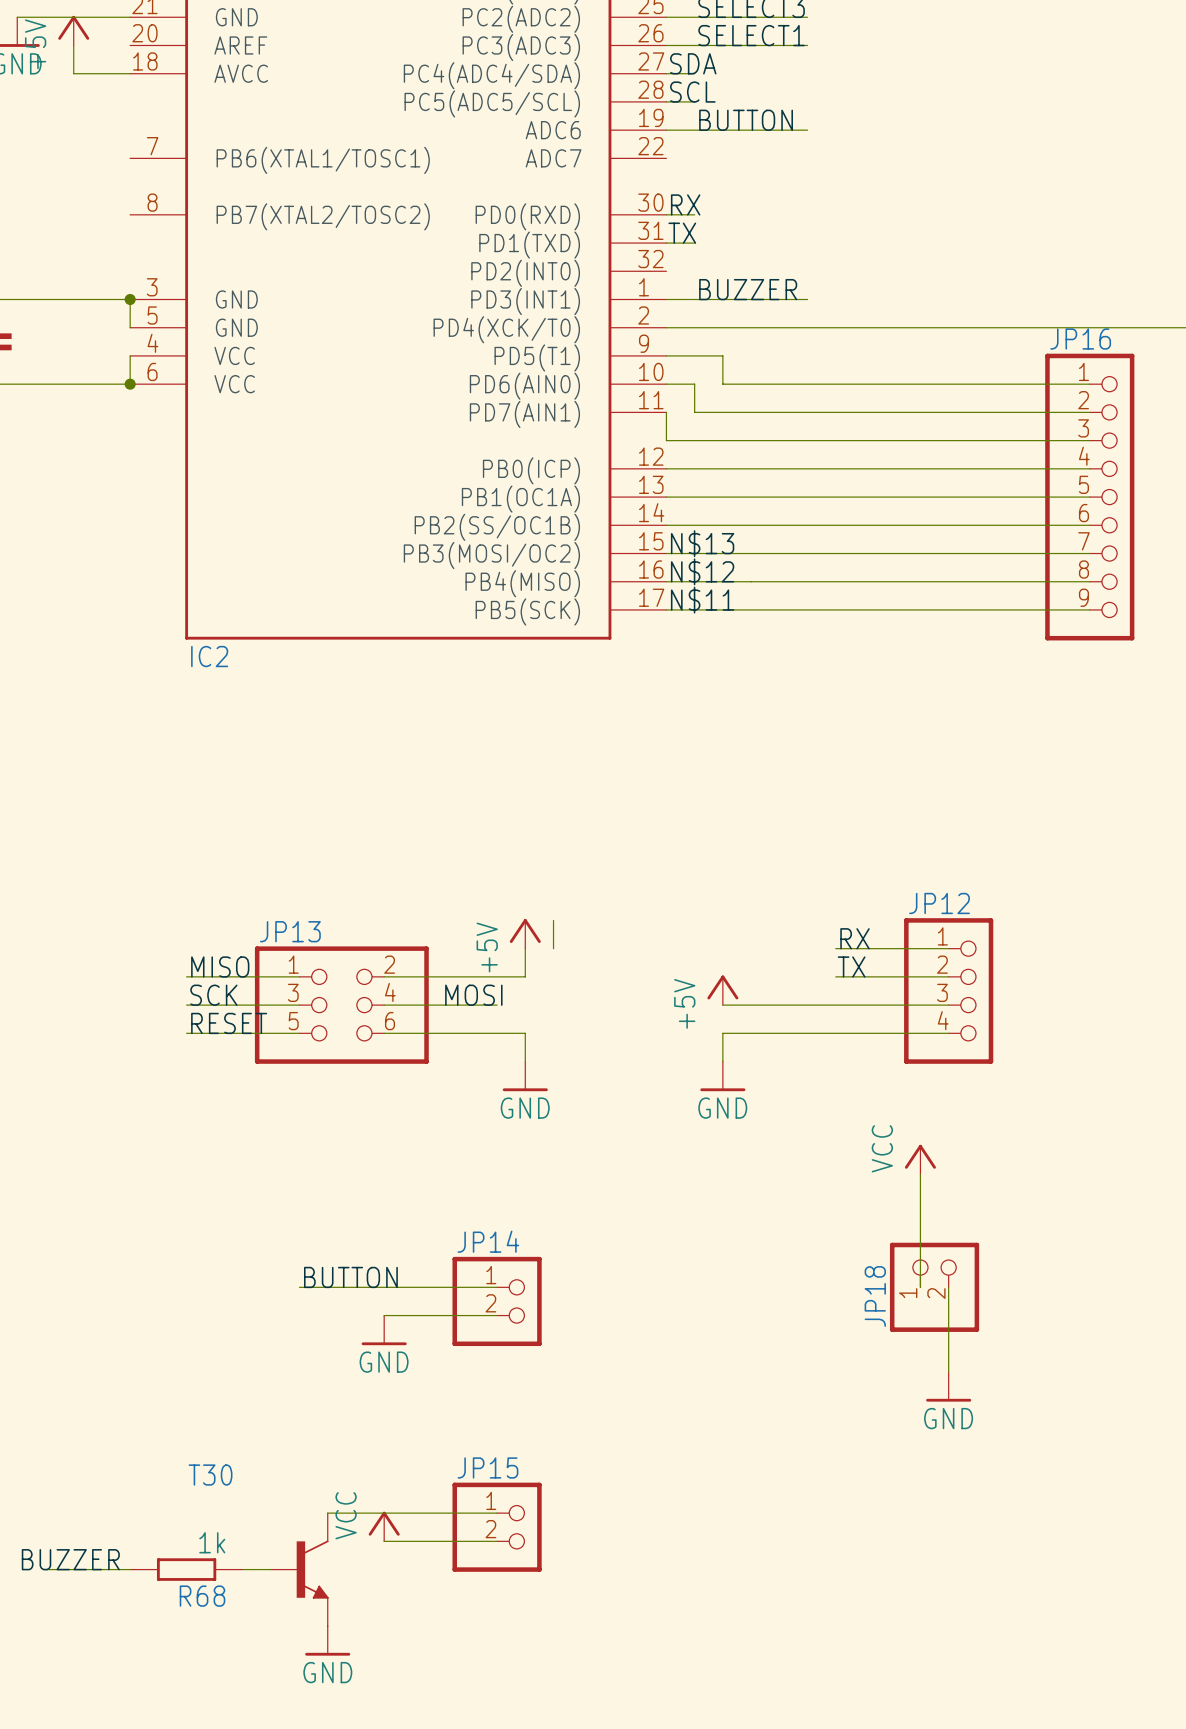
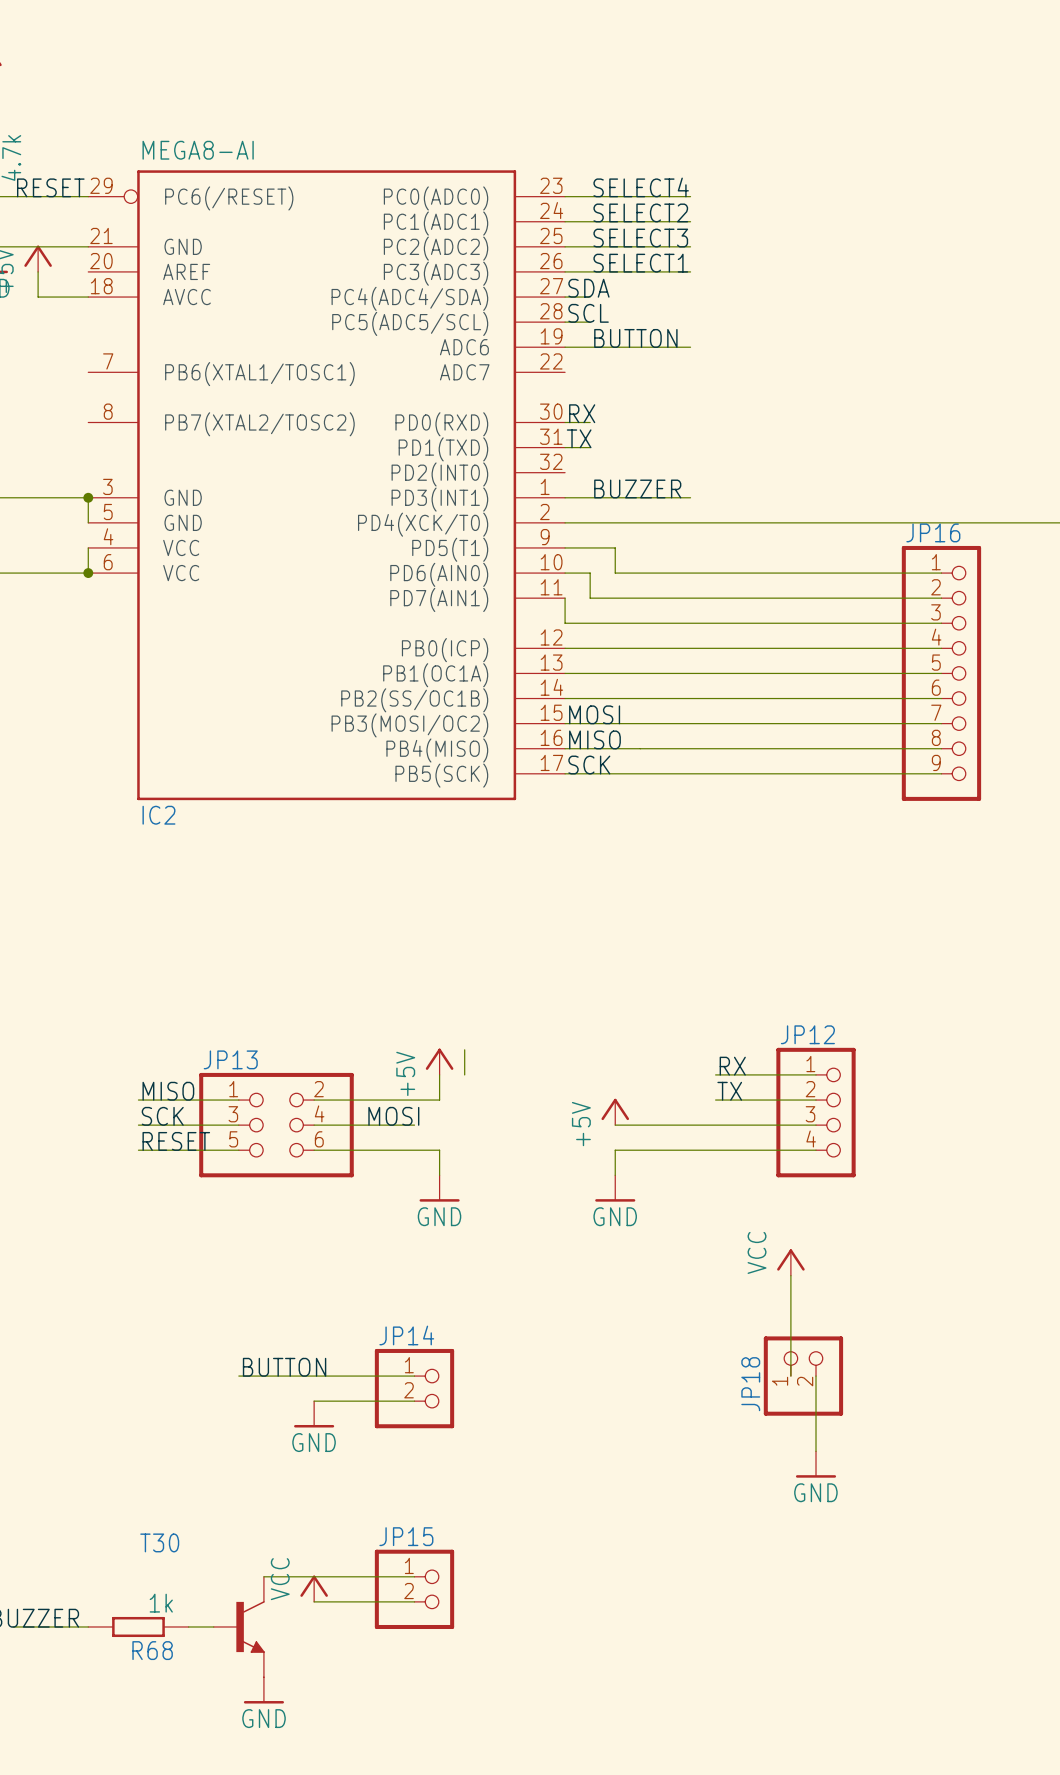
label: N$13 (702, 543) -> MOSI (594, 714)
label: N$12 (702, 571) -> MISO (594, 739)
label: N$11 (702, 600) -> SCK (589, 765)

